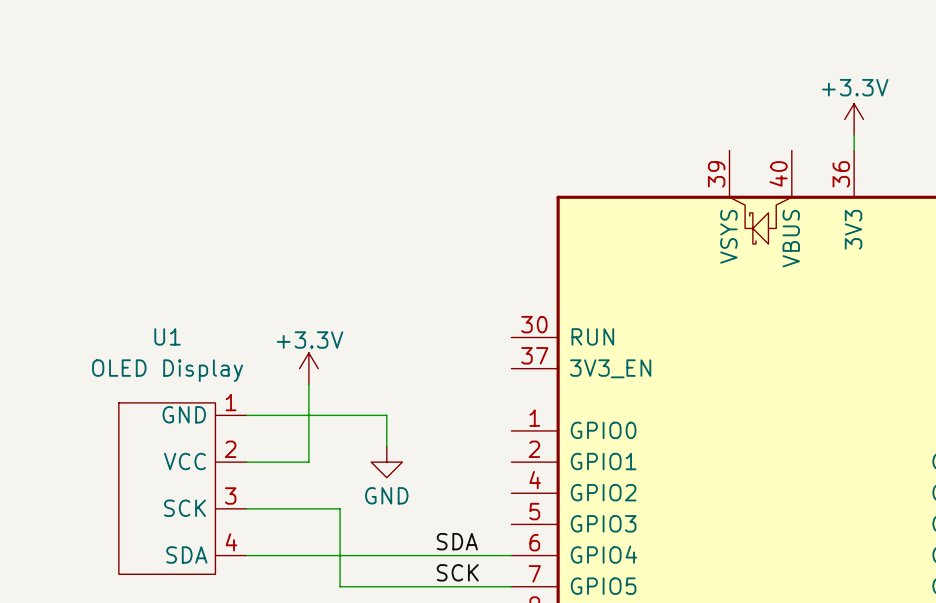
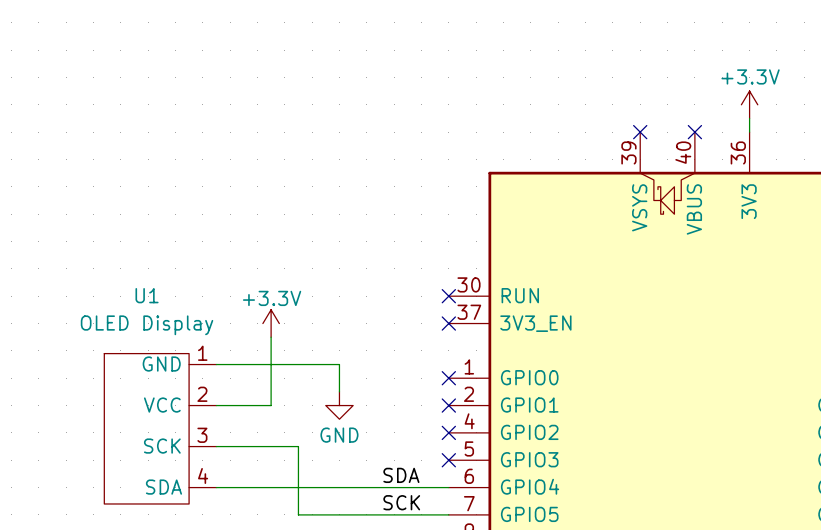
no-connect mark: none -> (640, 132)
no-connect mark: none -> (694, 132)
no-connect mark: none -> (448, 296)
no-connect mark: none -> (448, 323)
no-connect mark: none -> (448, 378)
no-connect mark: none -> (448, 405)
no-connect mark: none -> (448, 432)
no-connect mark: none -> (448, 460)

